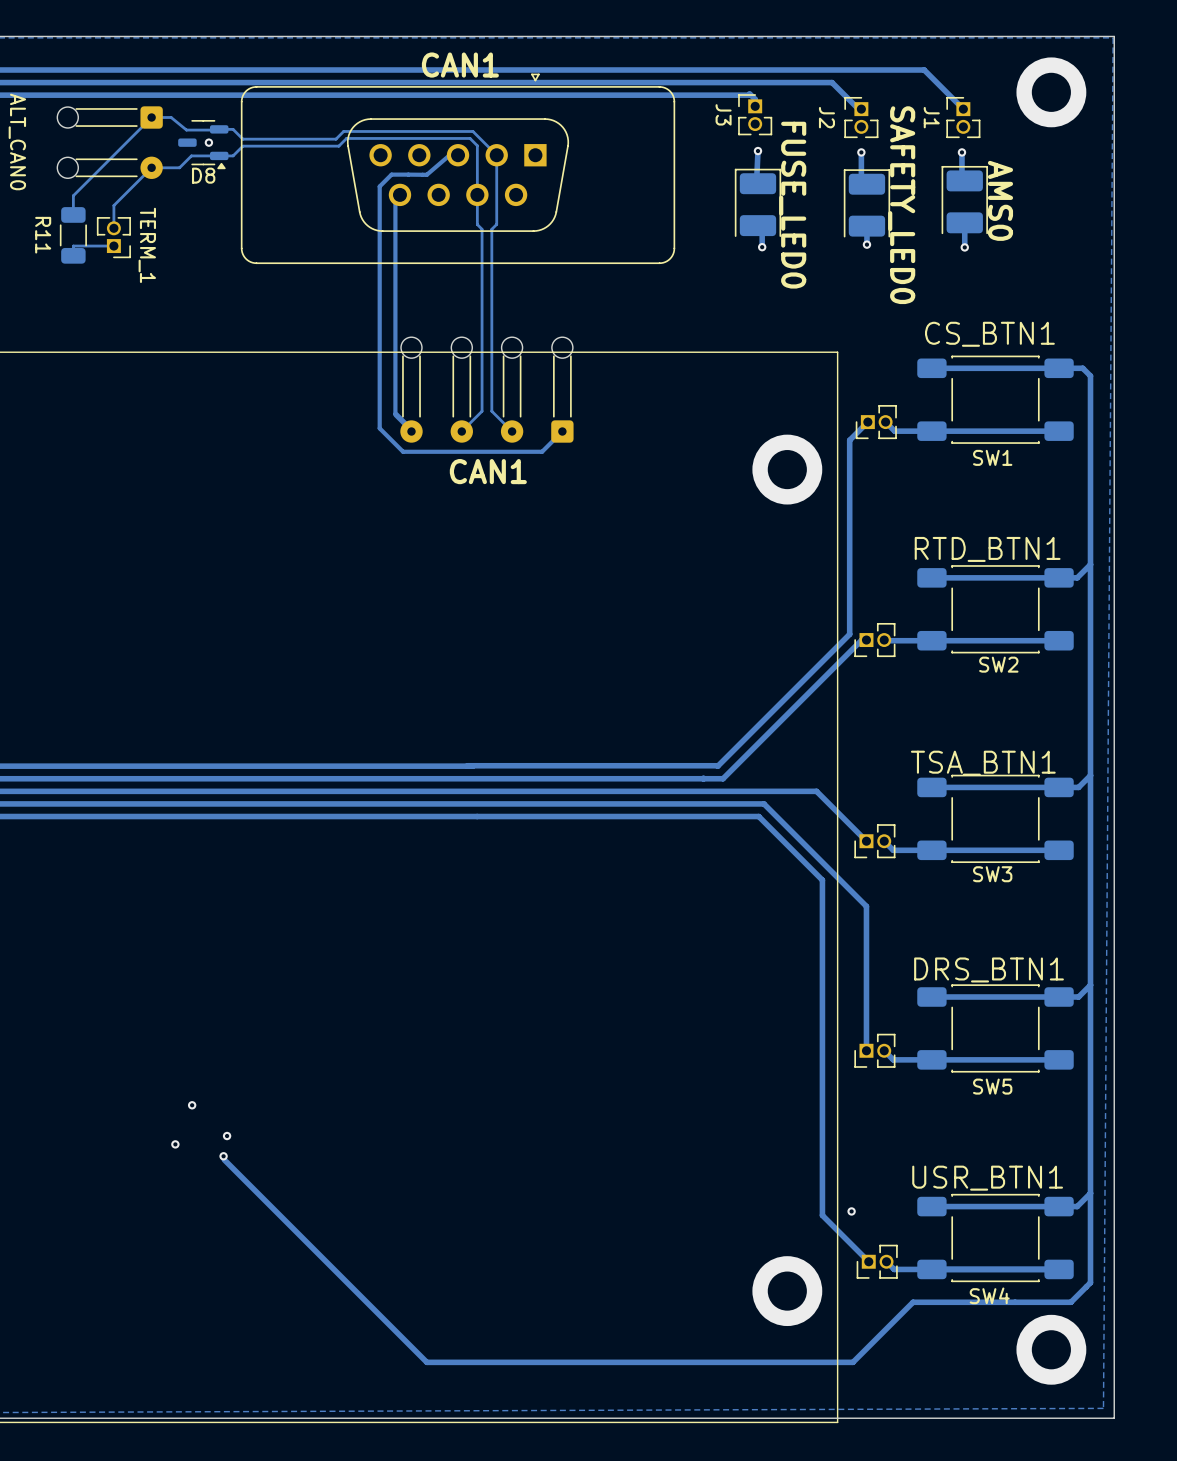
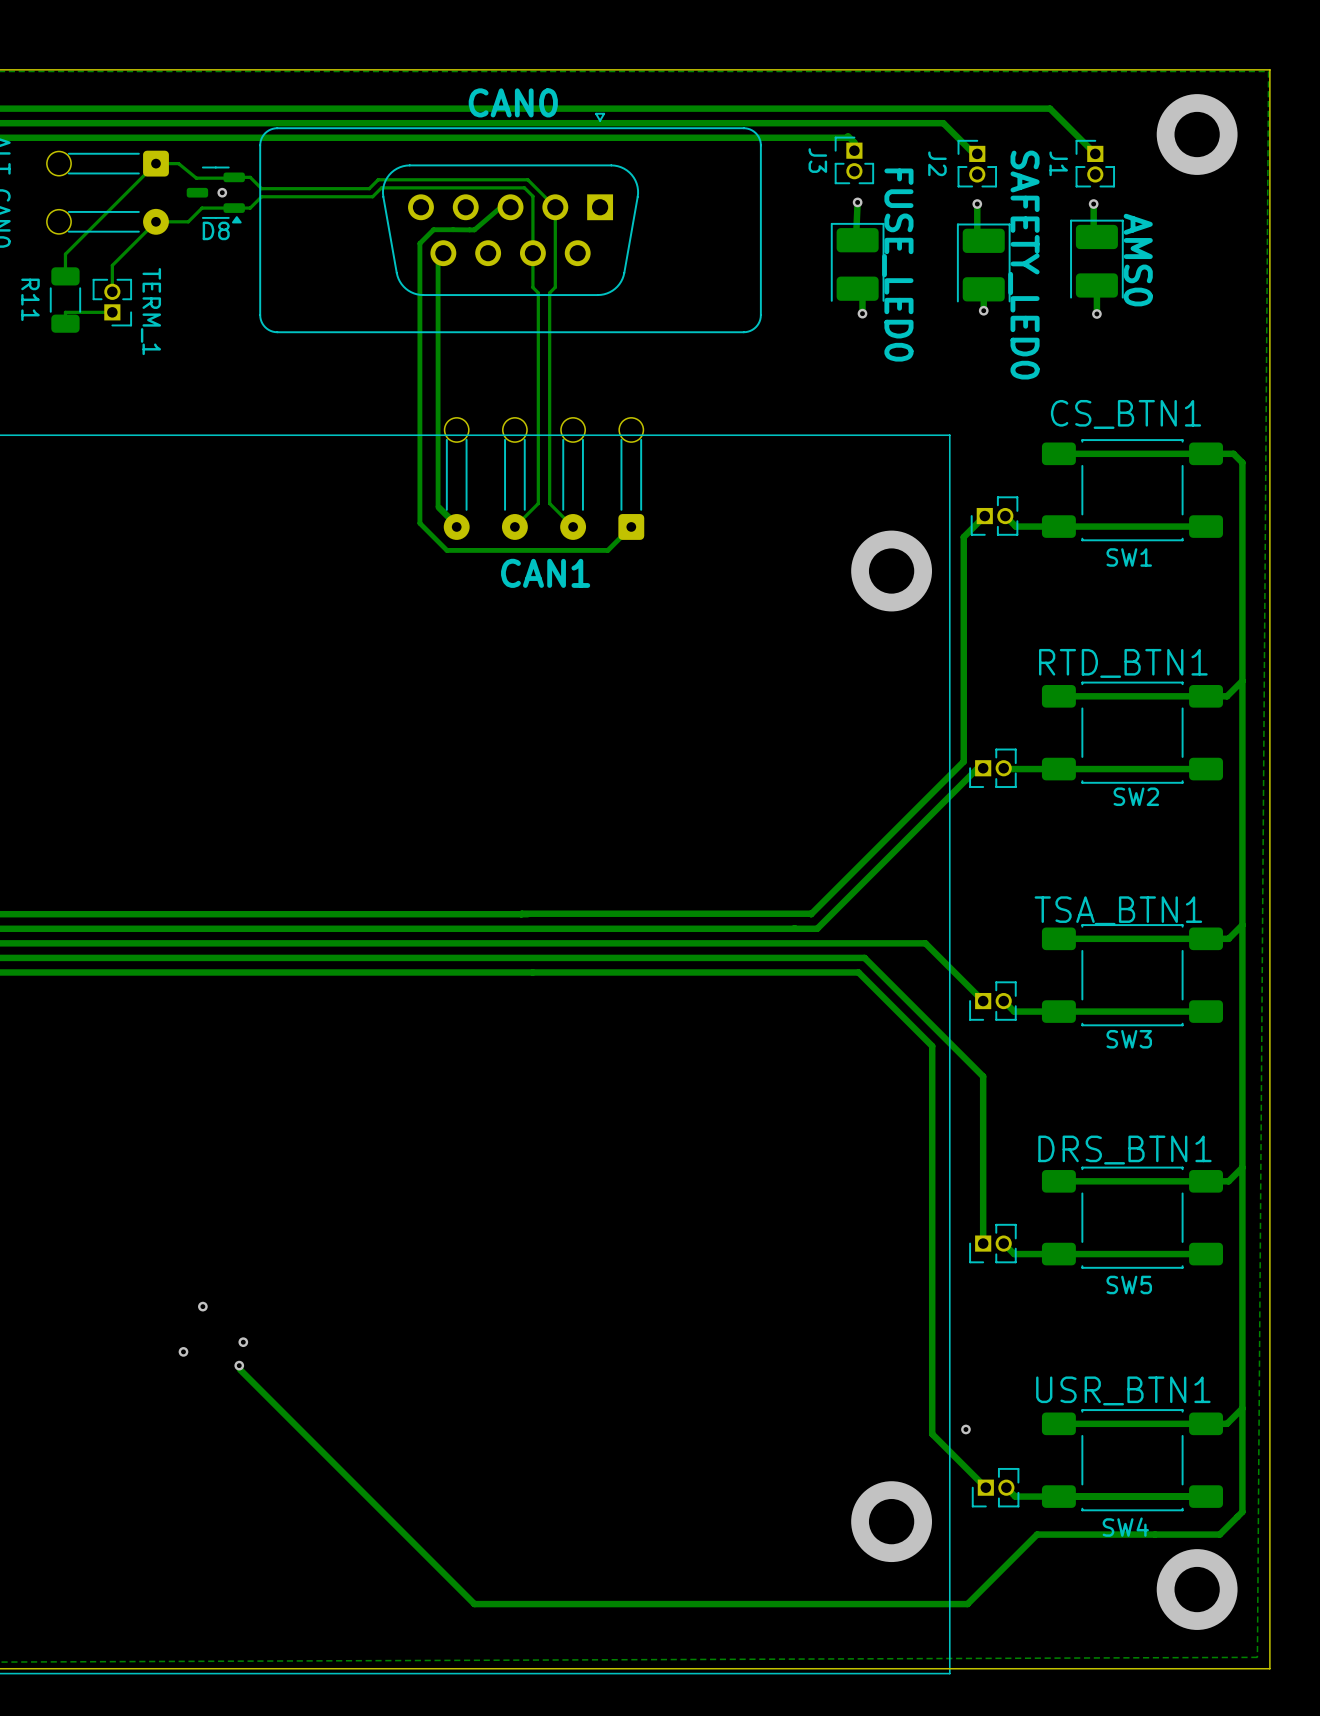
CAN1 name: CAN1 (460, 65) -> CAN0 (513, 102)

